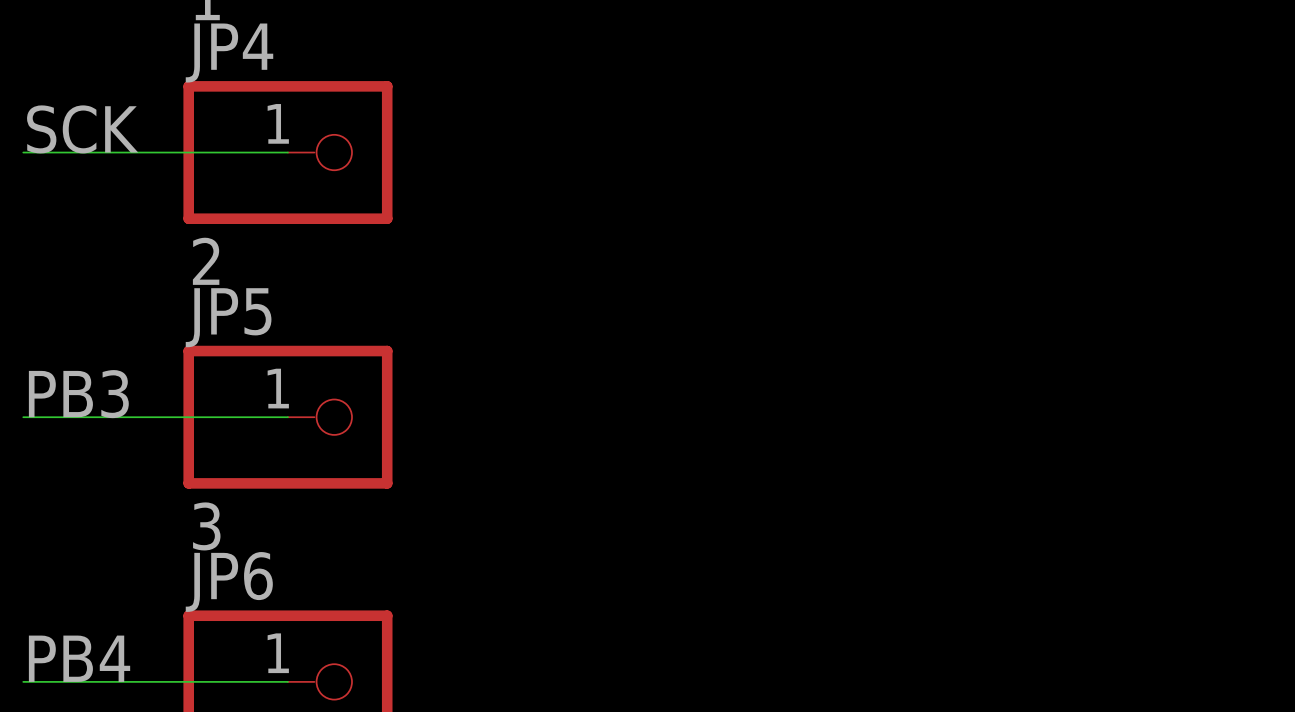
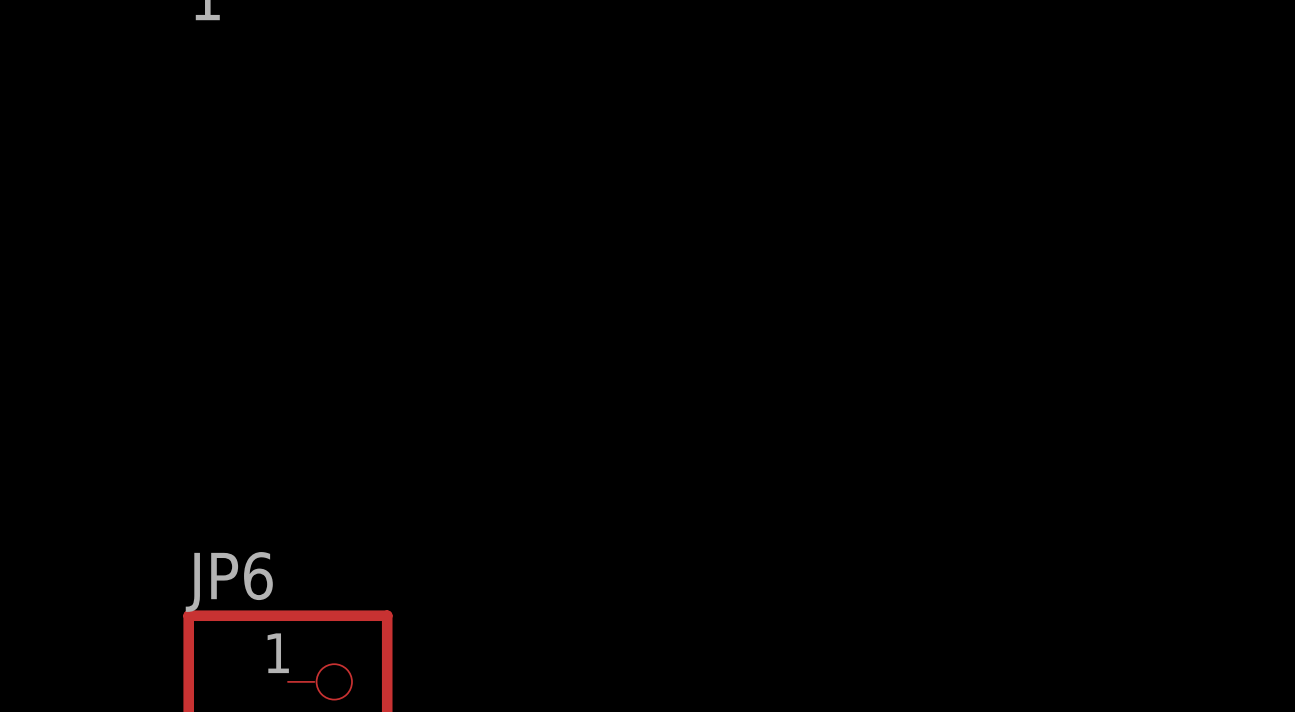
label: SCK (82, 129) -> none
wire: (23, 152) (287, 152) -> none
JP4: 2 (287, 152) -> none
label: PB3 (78, 394) -> none
wire: (23, 417) (287, 417) -> none
JP5: 3 (287, 417) -> none
label: PB4 (79, 658) -> none
wire: (23, 681) (287, 681) -> none

